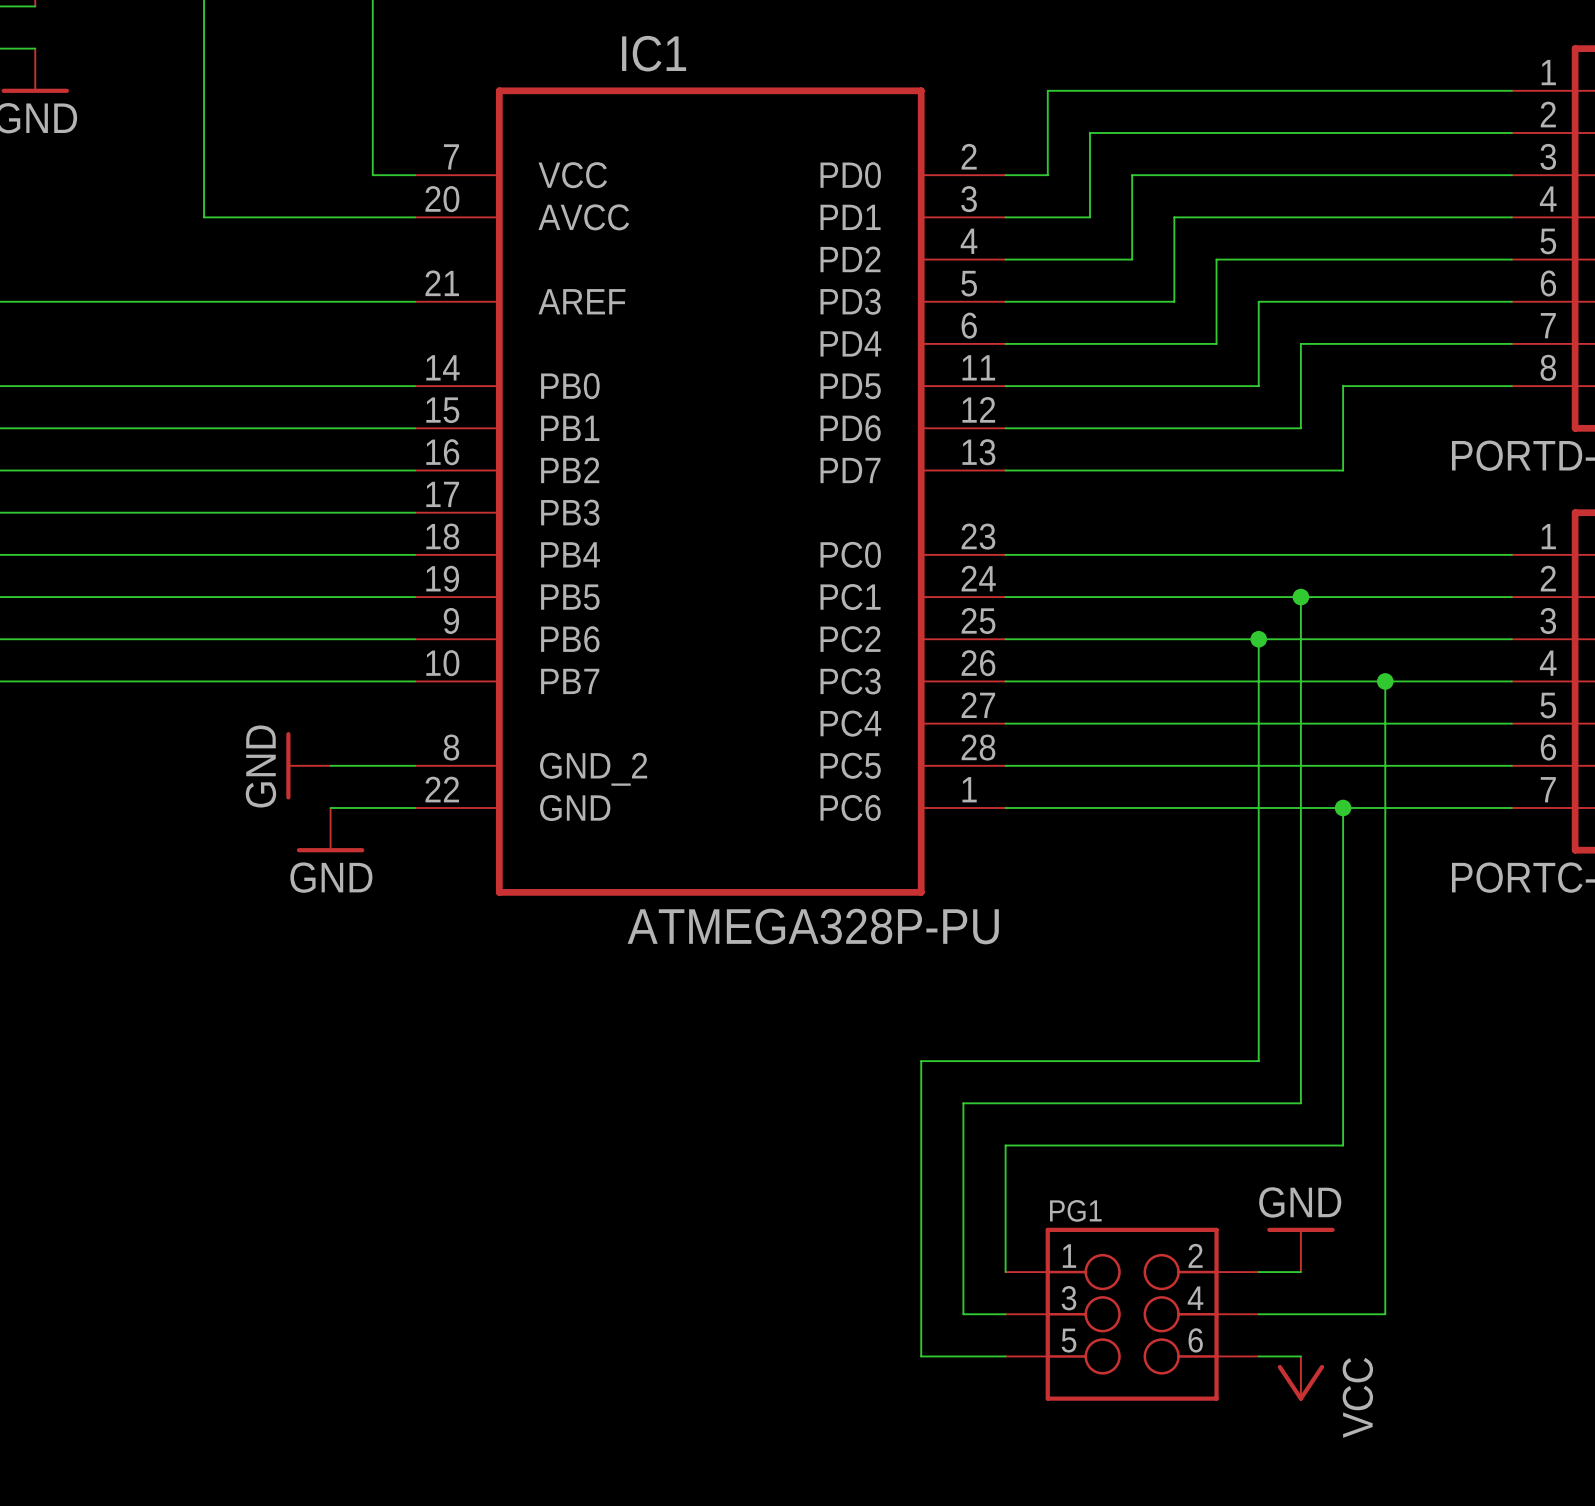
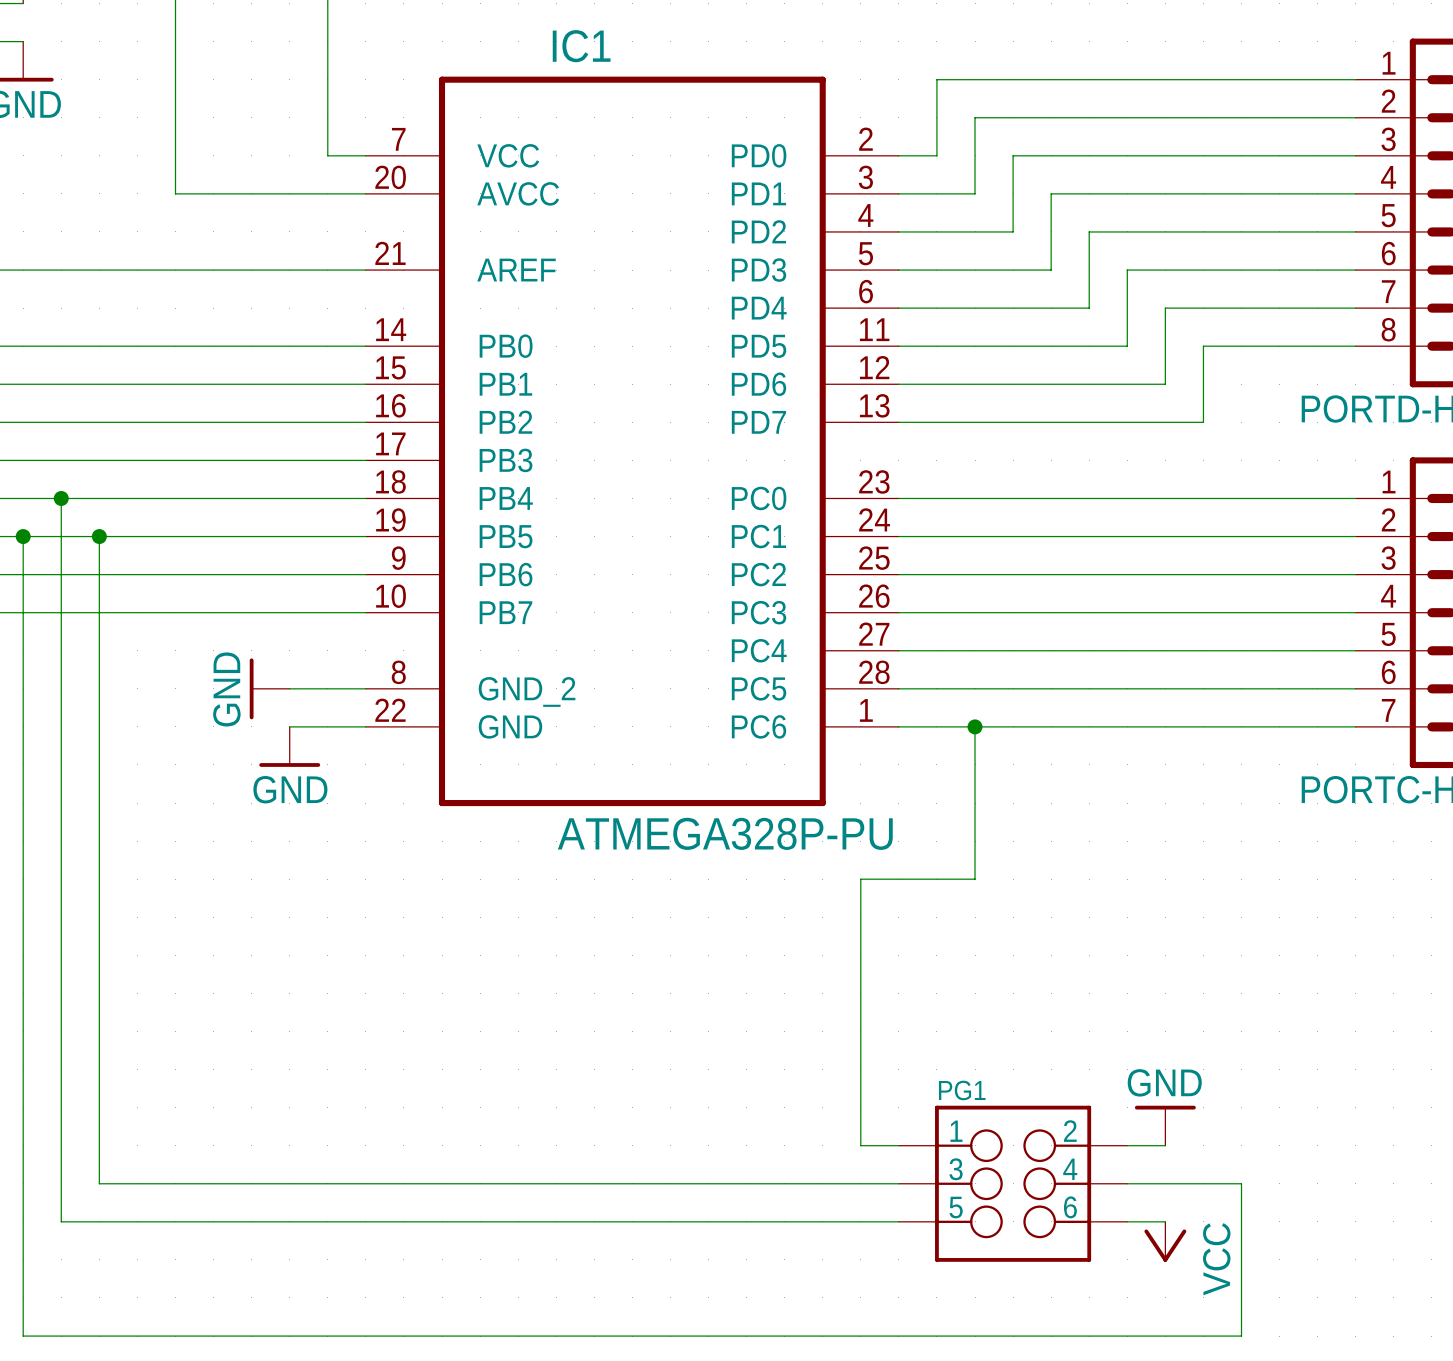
junction: none -> (61, 498)
junction: none -> (23, 536)
wire: none -> (99, 536) (99, 1183) (860, 1183)
junction: none -> (99, 536)
wire: (1300, 597) (1300, 1103) (963, 1103) -> (975, 726) (975, 879) (860, 879) (860, 993)
junction: (1300, 597) -> none
wire: (1258, 639) (1258, 1061) (921, 1061) (921, 1356) -> (61, 498) (61, 1221) (822, 1221)
junction: (1258, 639) -> none
wire: (1385, 681) (1385, 1314) -> (23, 536) (23, 1336) (1241, 1336) (1241, 1183)
junction: (1385, 681) -> none
junction: none -> (975, 726)
wire: (1343, 808) (1343, 1145) (1005, 1145) (1005, 1272) -> none
junction: (1343, 808) -> none
wire: (963, 1272) (963, 1314) -> (860, 1145) (898, 1145)

